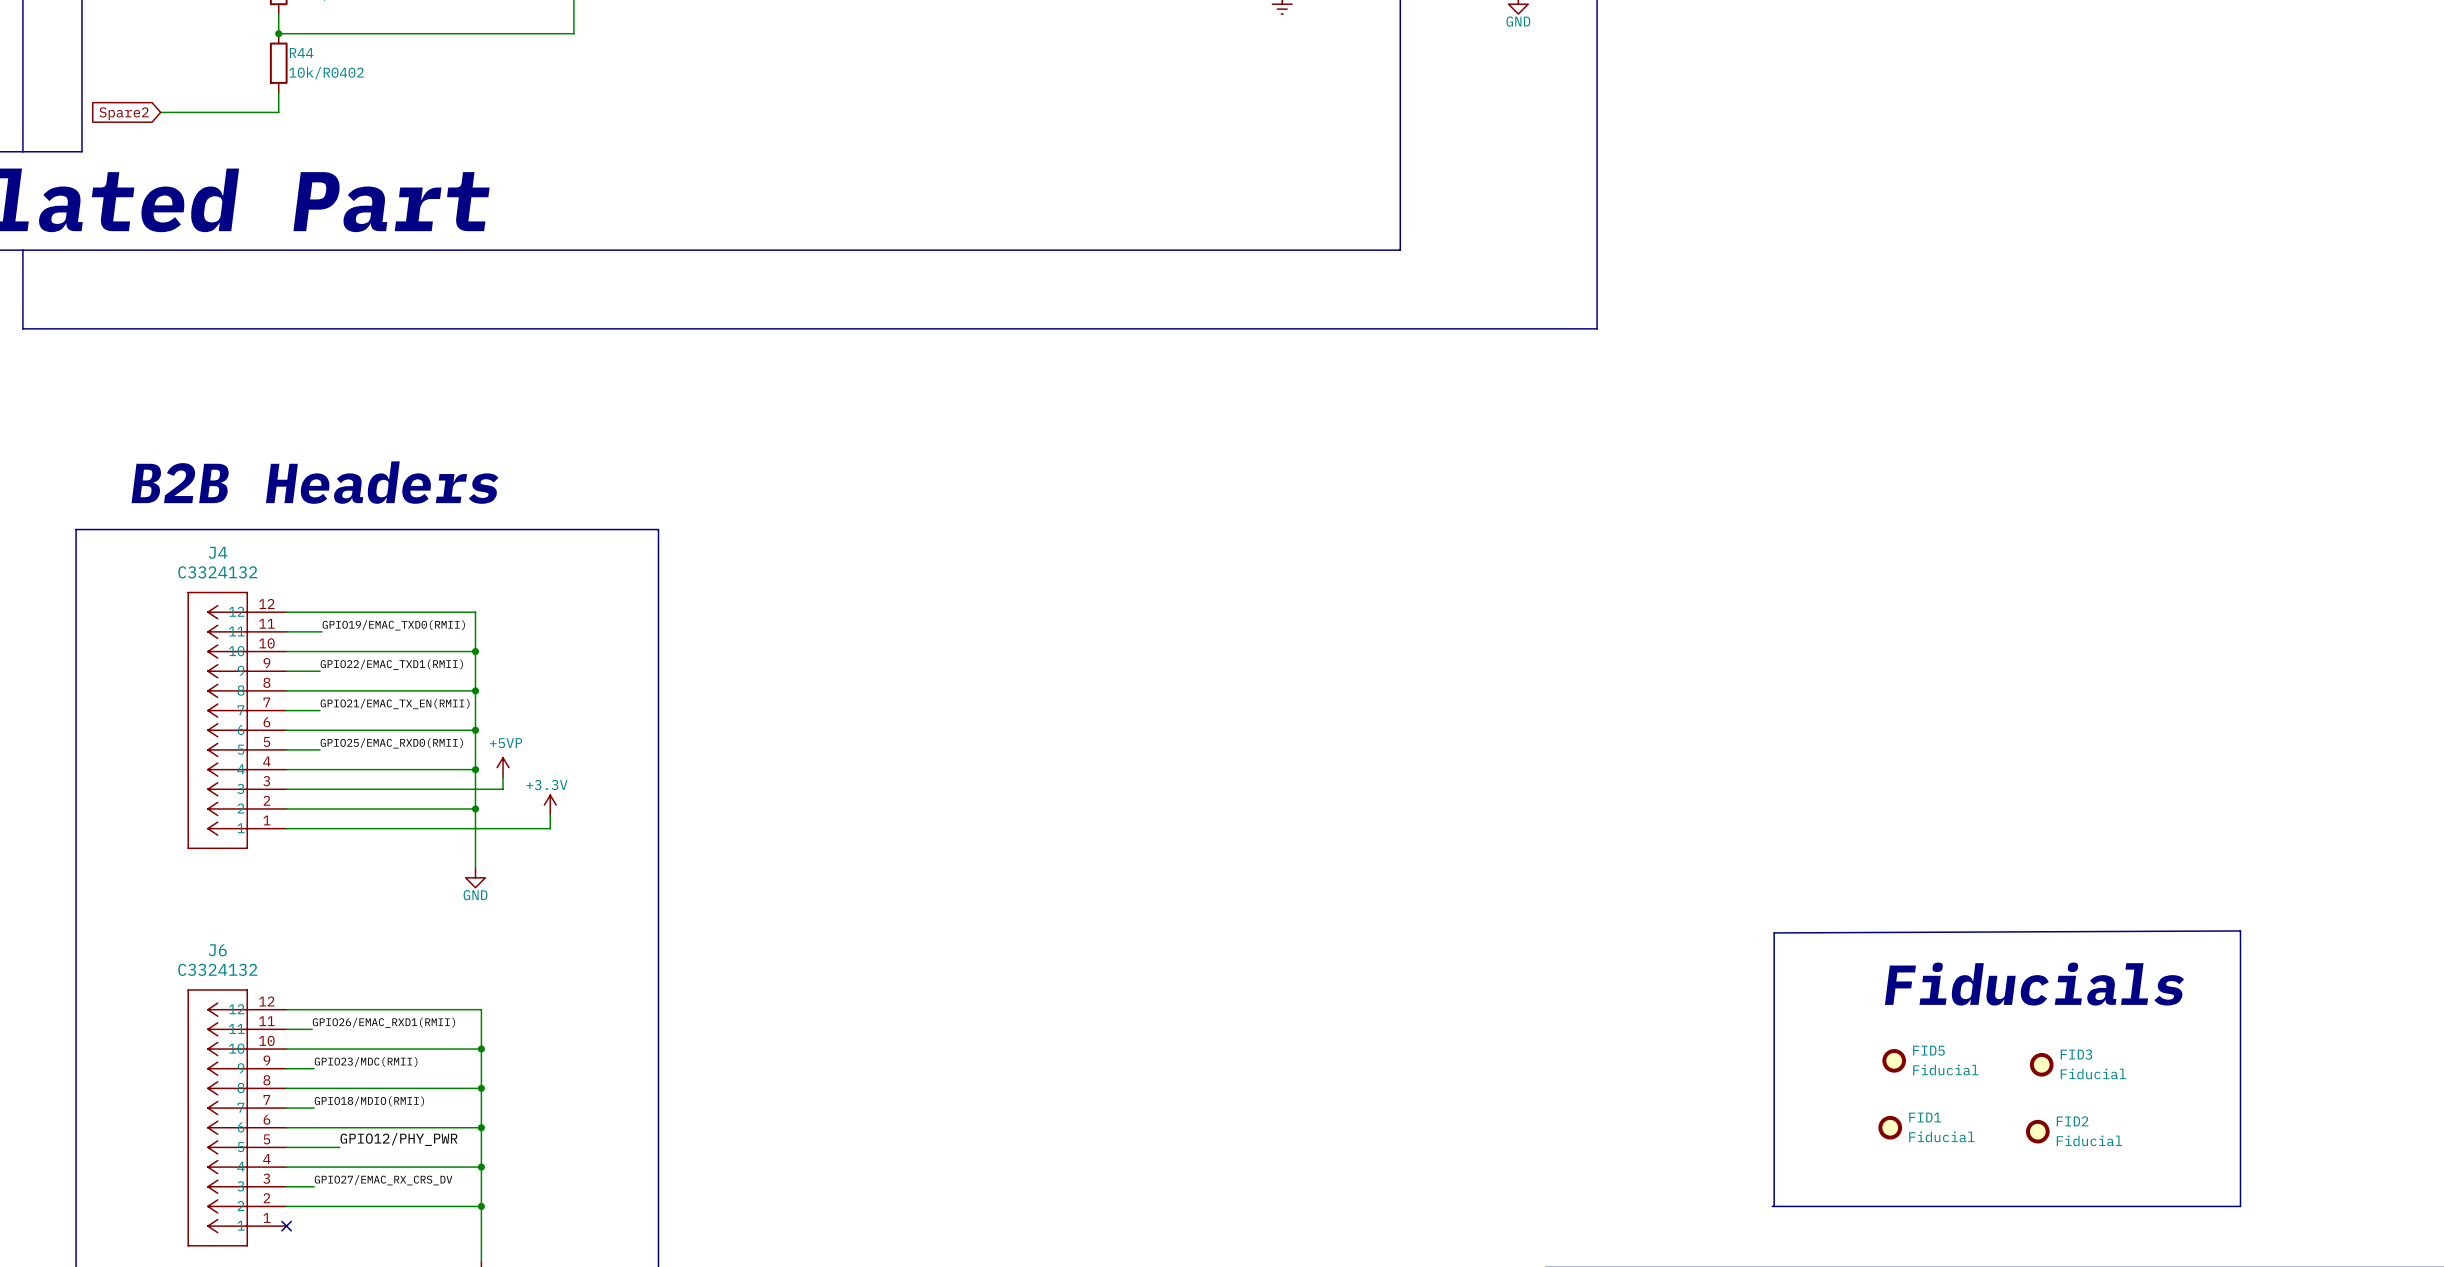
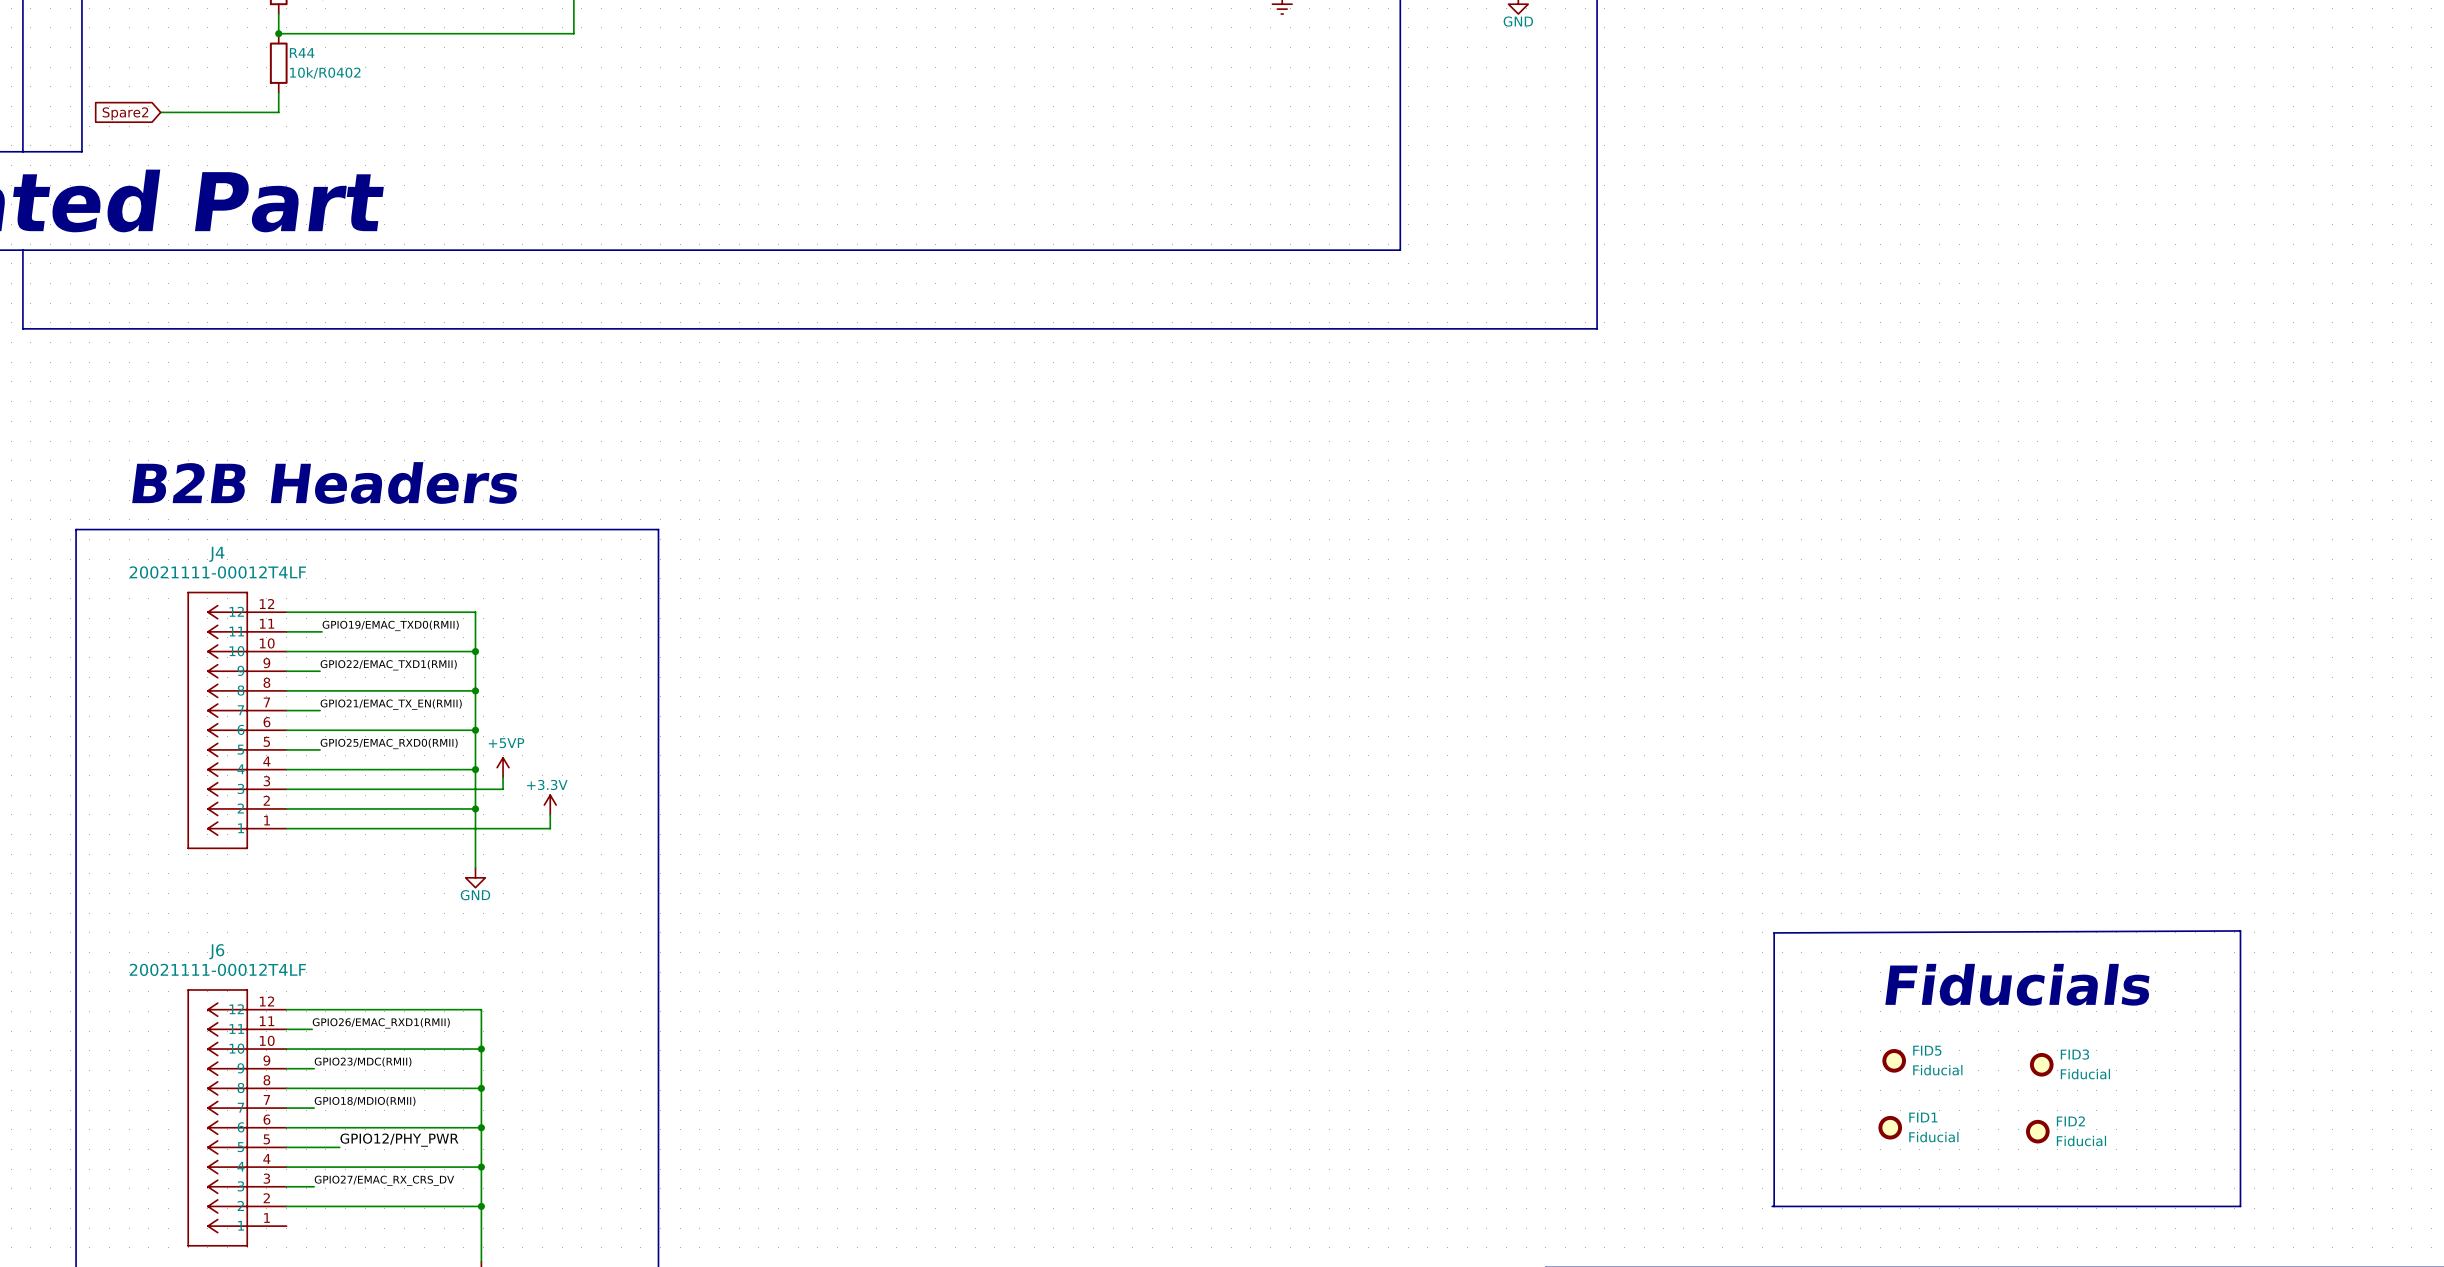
J4 value: C3324132 (217, 572) -> 20021111-00012T4LF (217, 572)
J6 value: C3324132 (217, 969) -> 20021111-00012T4LF (217, 969)
no-connect mark: (286, 1226) -> none

